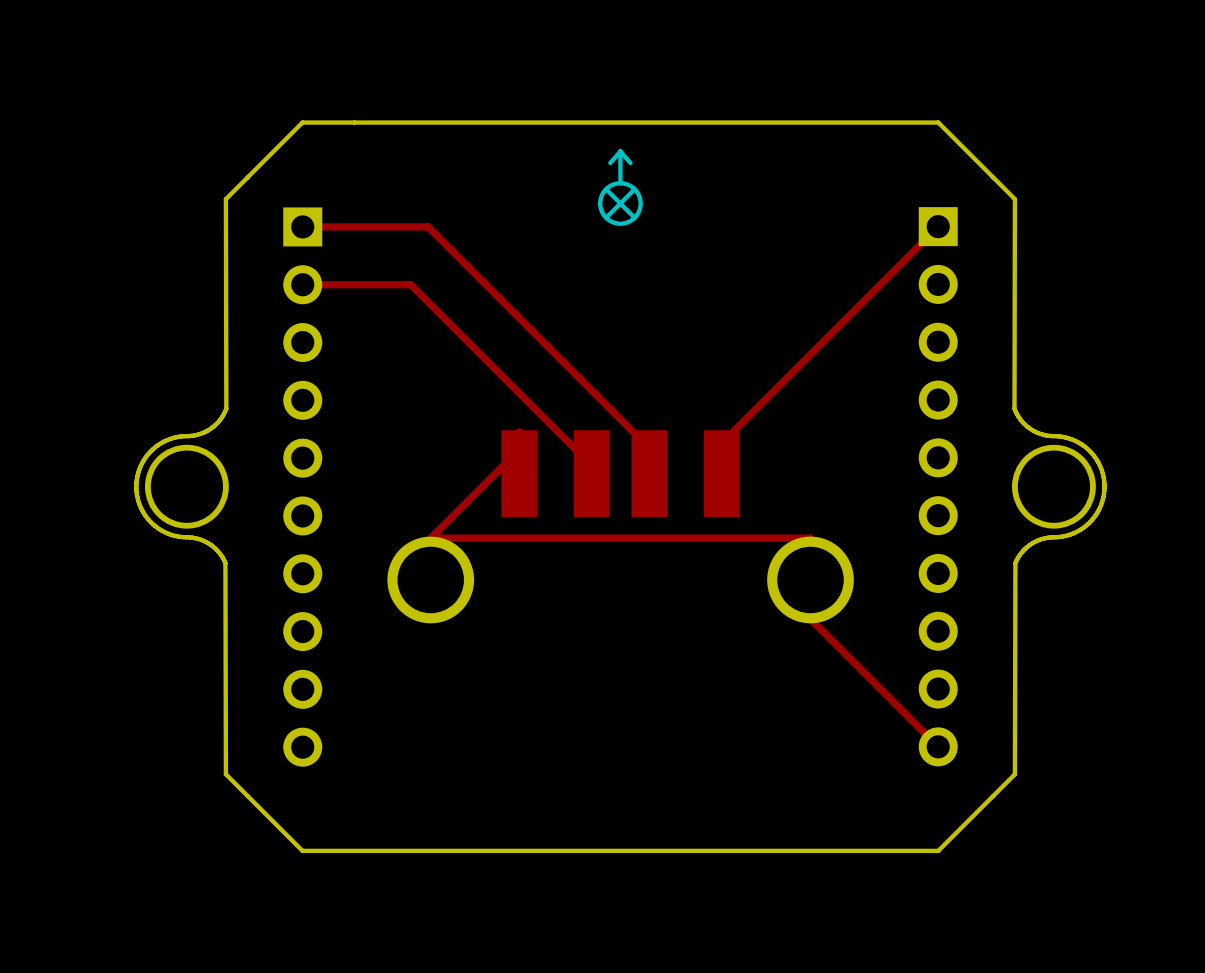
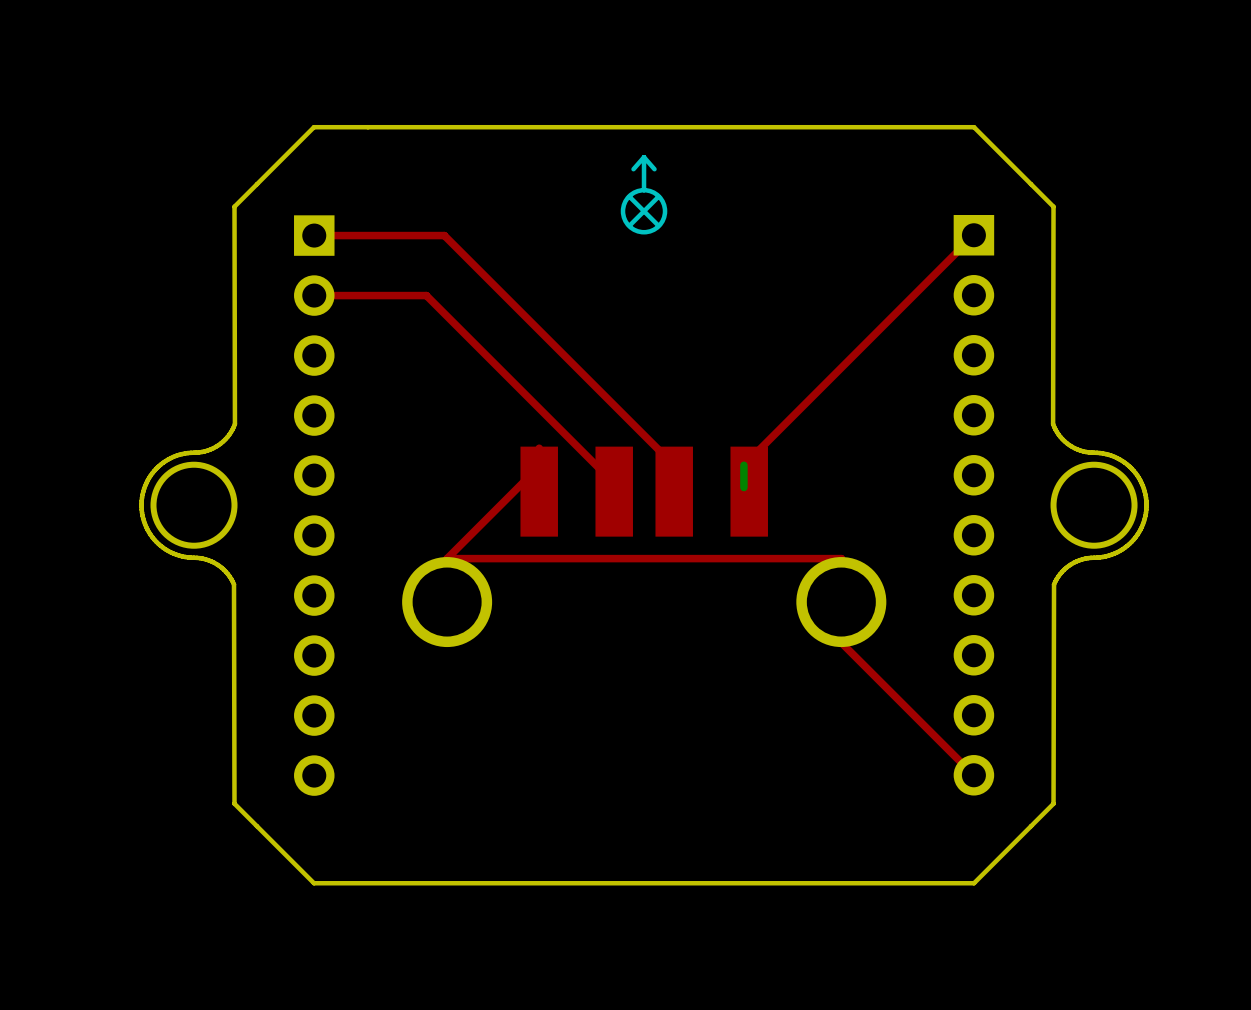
bottom track: none -> (743, 465) (743, 487)

